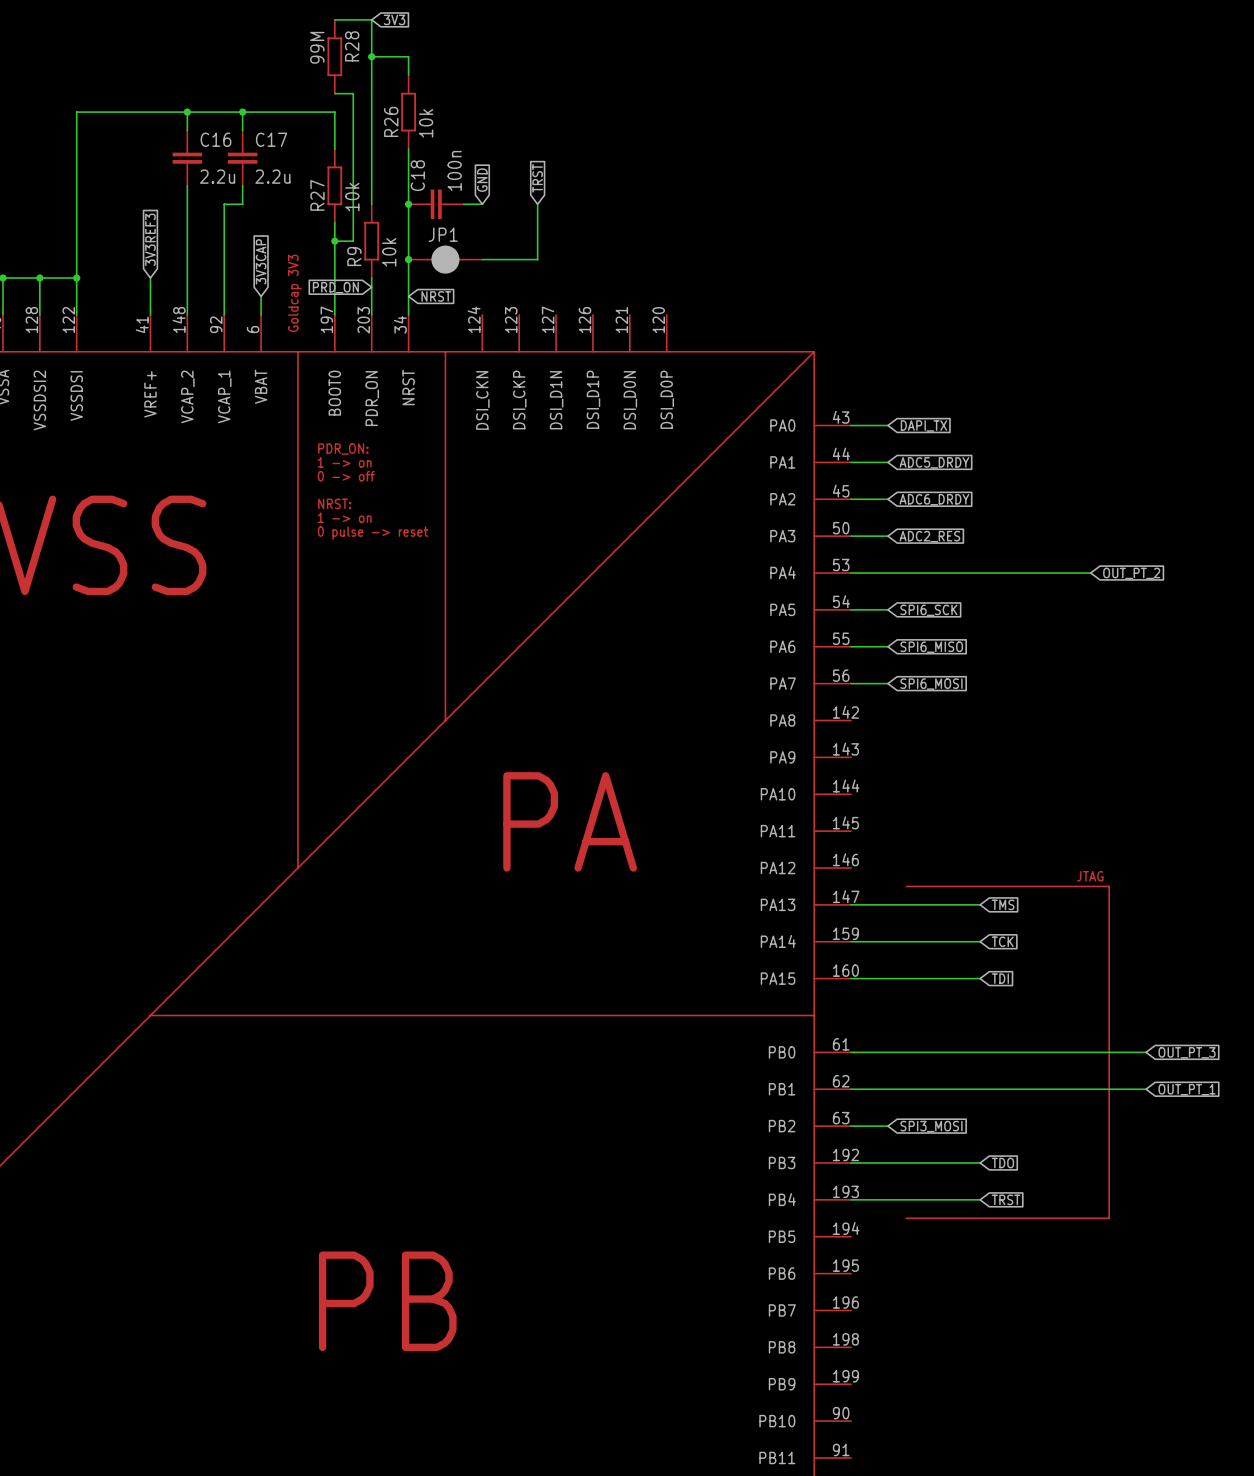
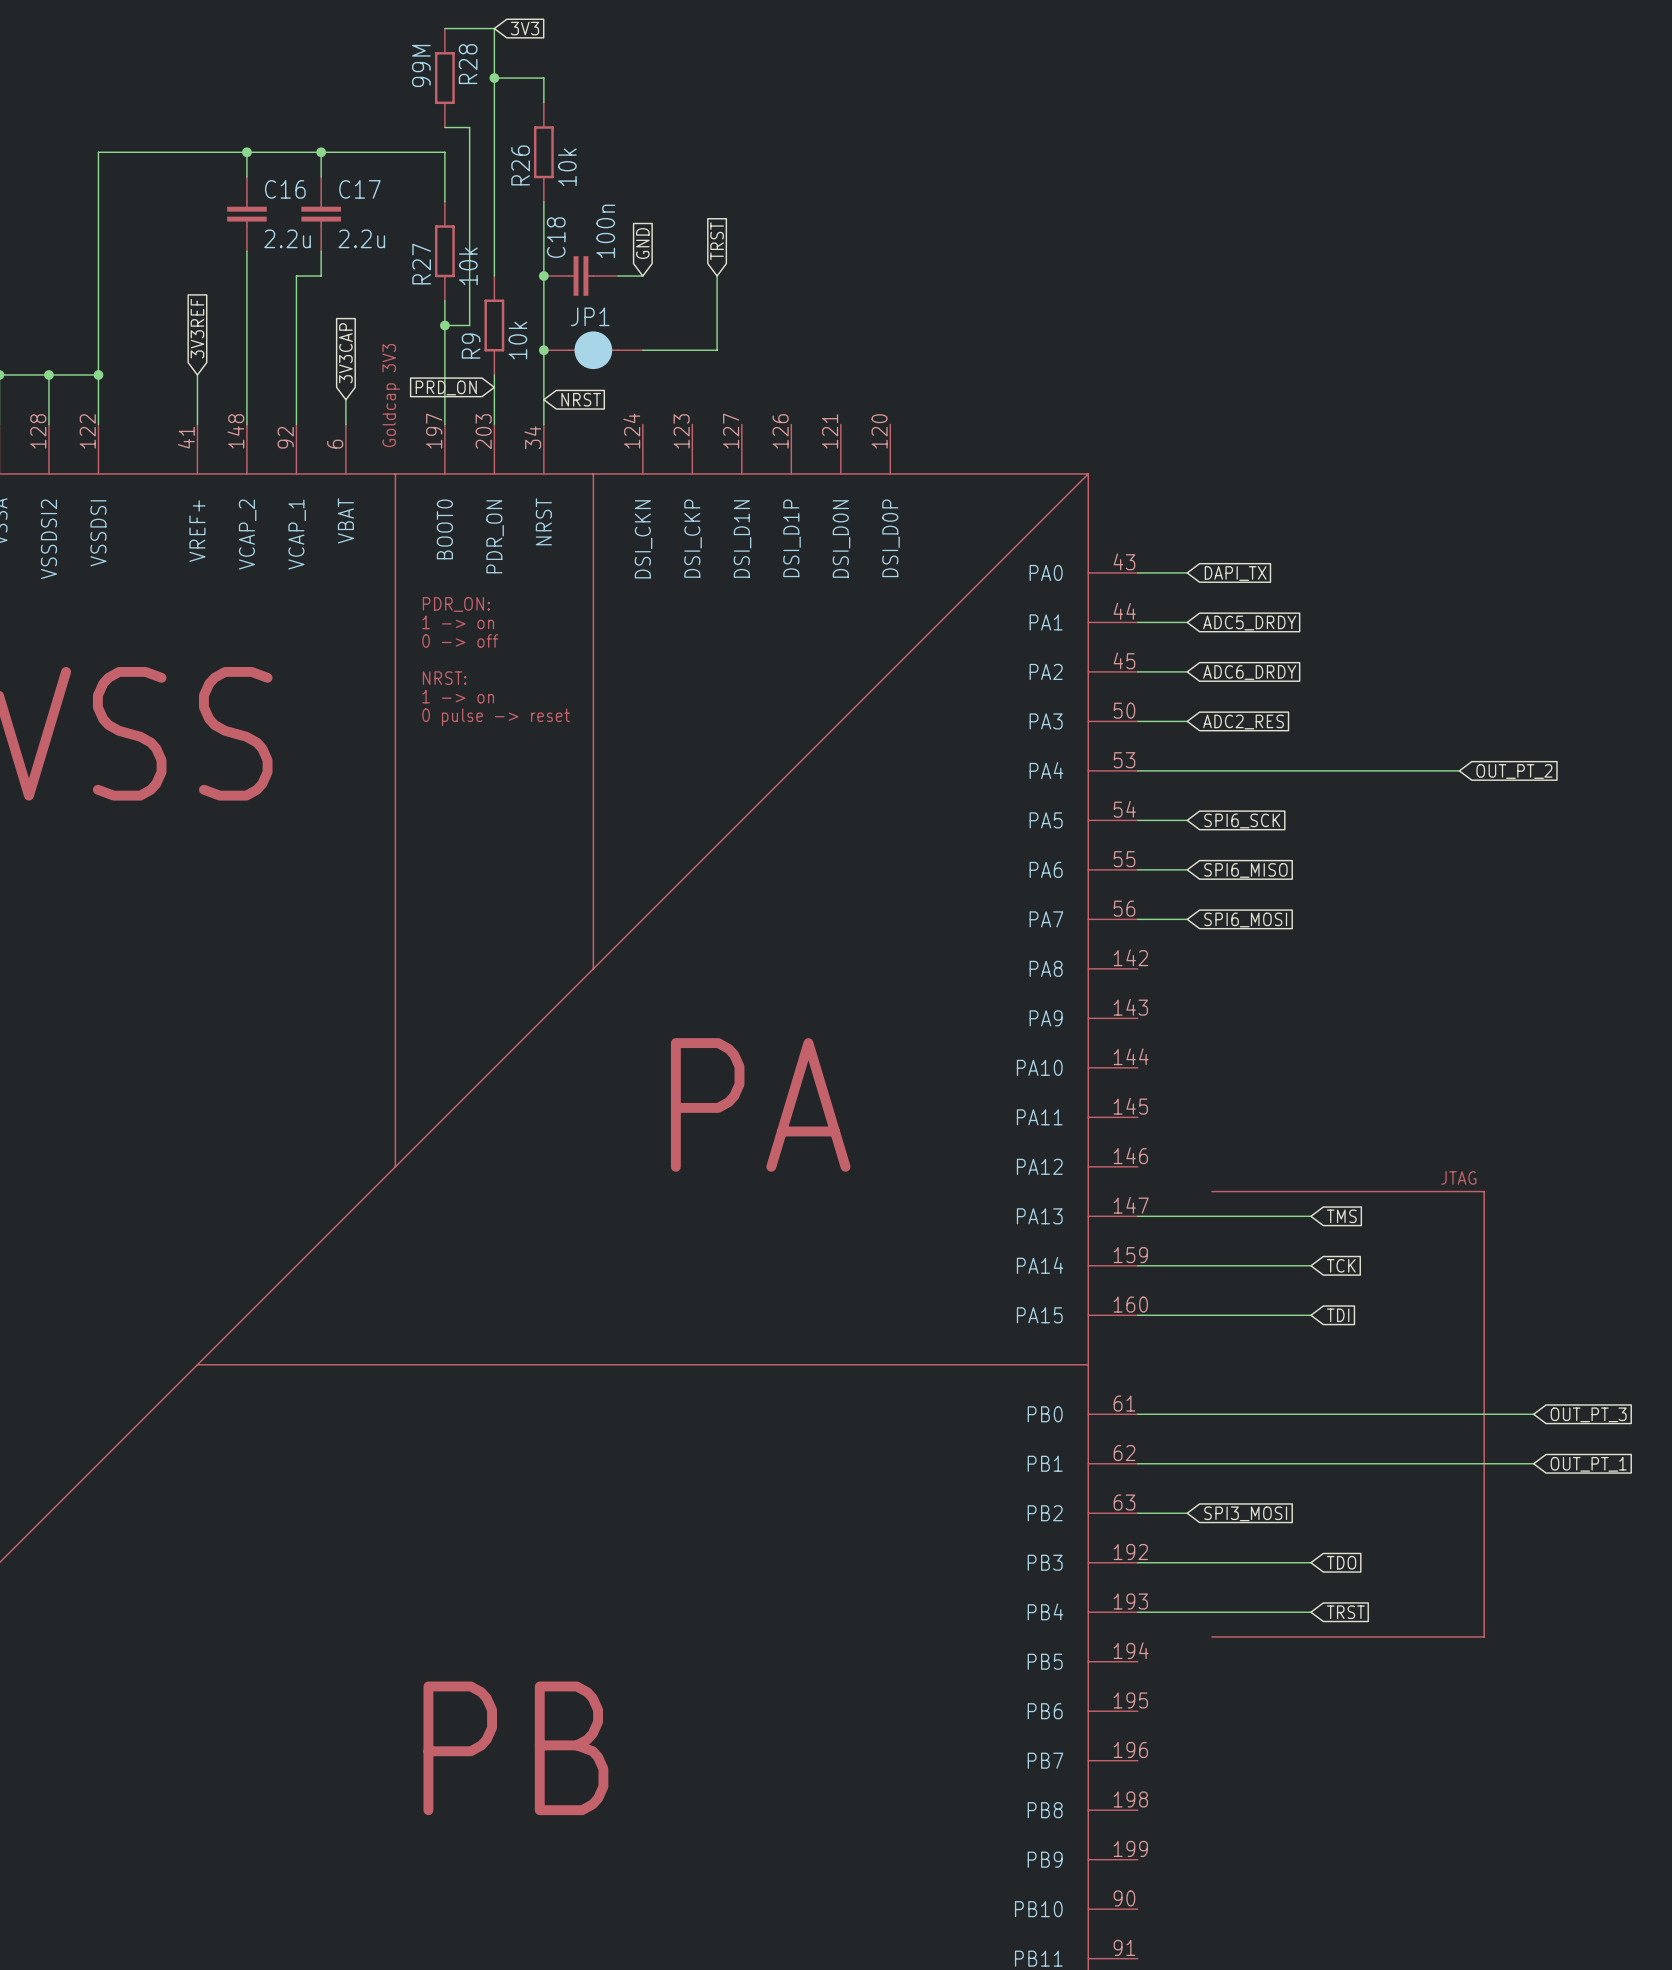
global label: 3V3REF3 (150, 239) -> 3V3REF (197, 328)

